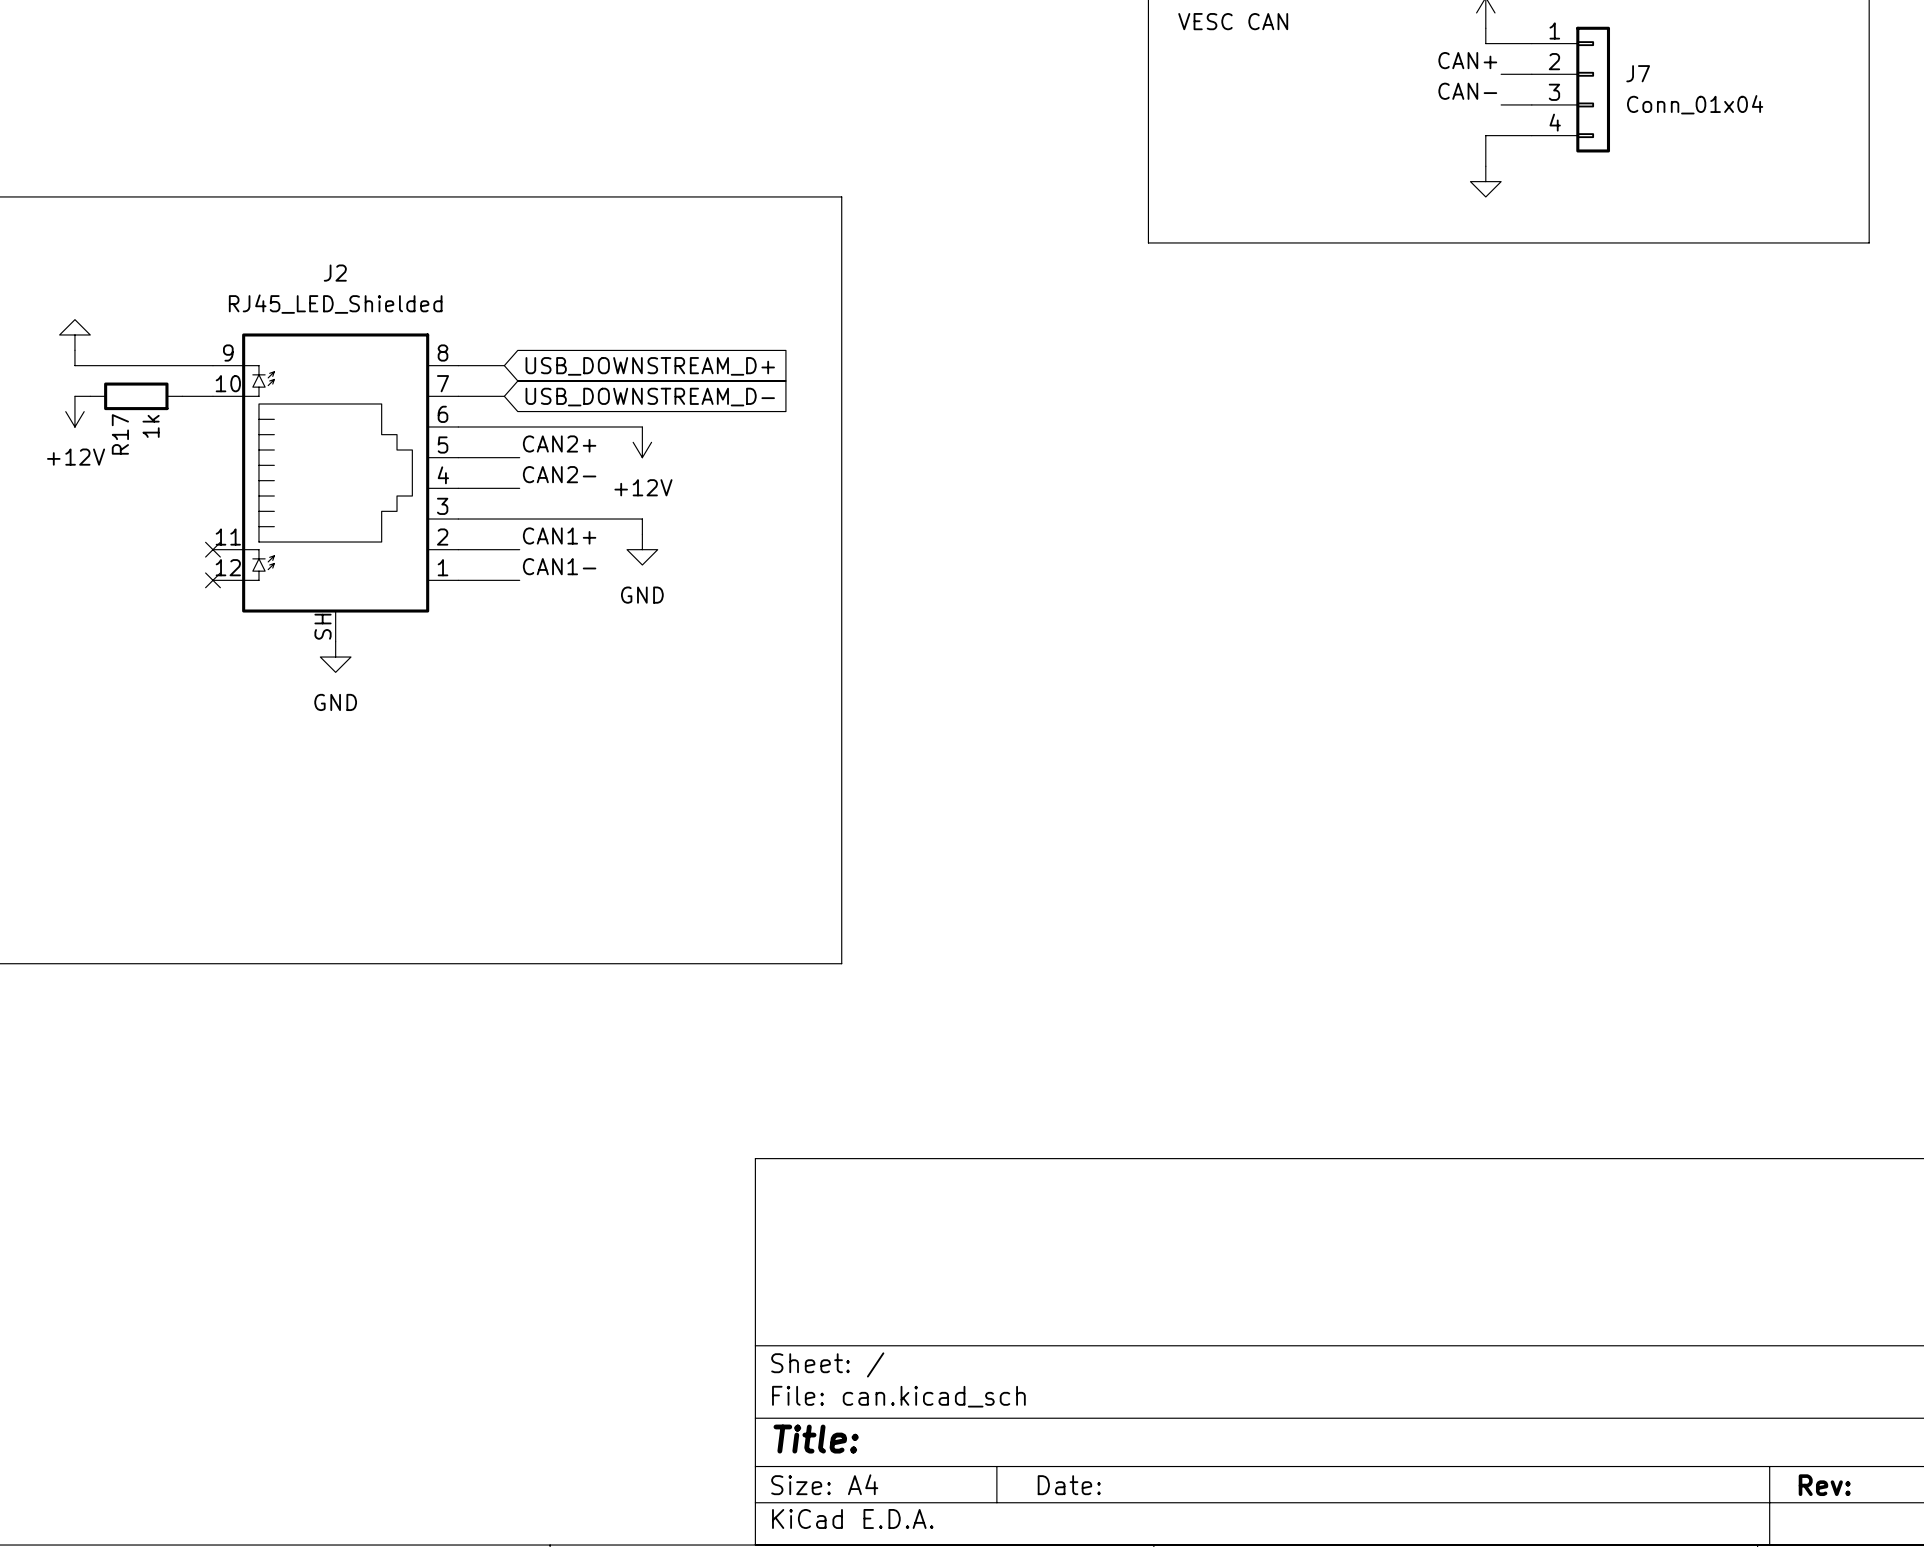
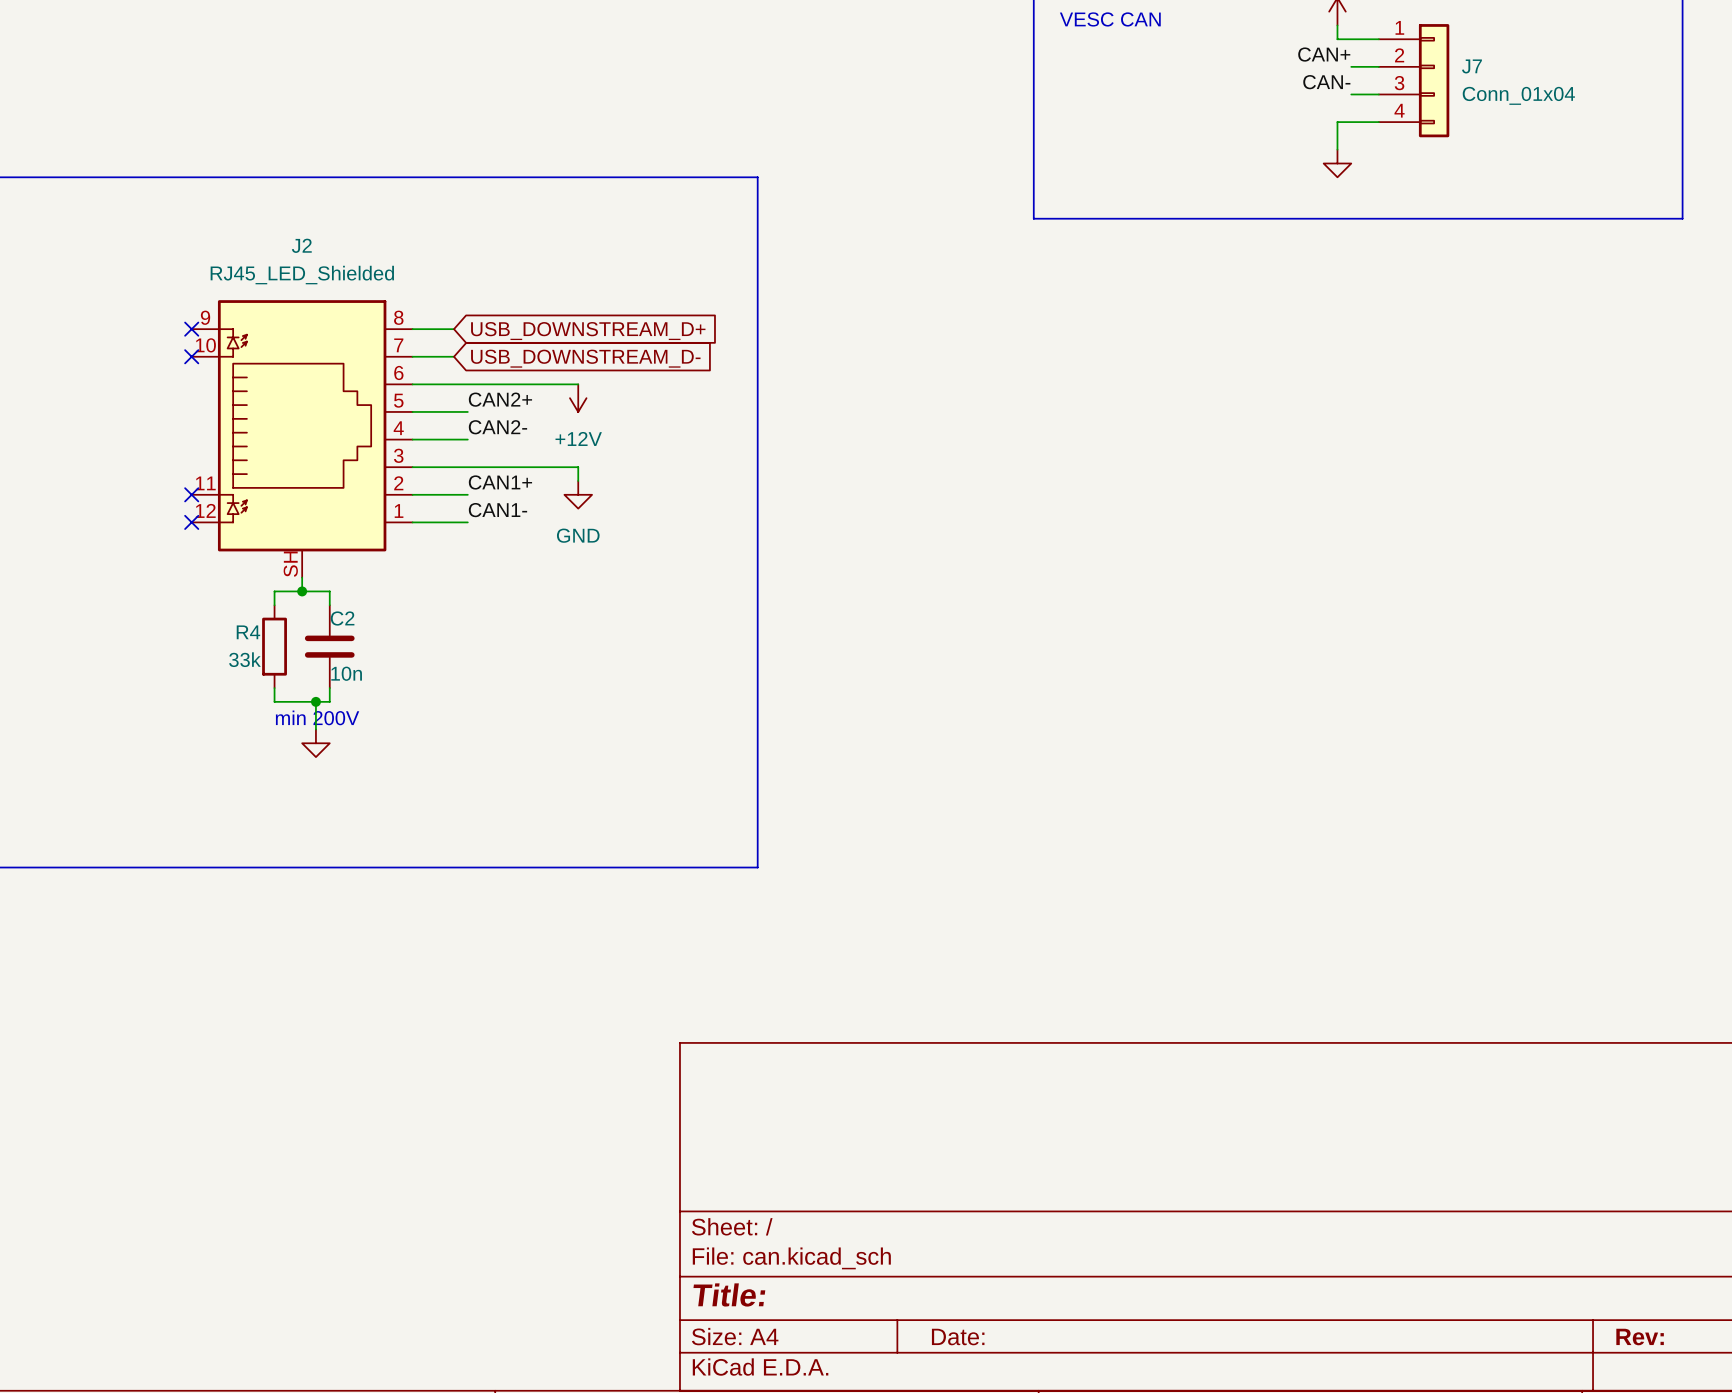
power symbol: (74, 334) -> none
wire: (74, 350) (74, 365) (212, 365) -> none
no-connect mark: none -> (191, 329)
wire: (74, 396) (90, 396) -> none
R17: 1k (136, 396) -> none
wire: (182, 396) (212, 396) -> none
no-connect mark: none -> (191, 356)
power symbol: +12V (74, 411) -> none
power symbol: GND (335, 657) -> none
junction: none -> (302, 591)
wire: none -> (274, 605) (274, 591) (329, 591) (329, 605)
R4: none -> 33k (274, 646)
C2: none -> 10n (329, 646)
wire: none -> (274, 688) (274, 701) (329, 701) (329, 688)
wire: none -> (315, 701) (315, 729)
junction: none -> (315, 701)
text: none -> min 200V (317, 717)
power symbol: none -> (315, 743)

